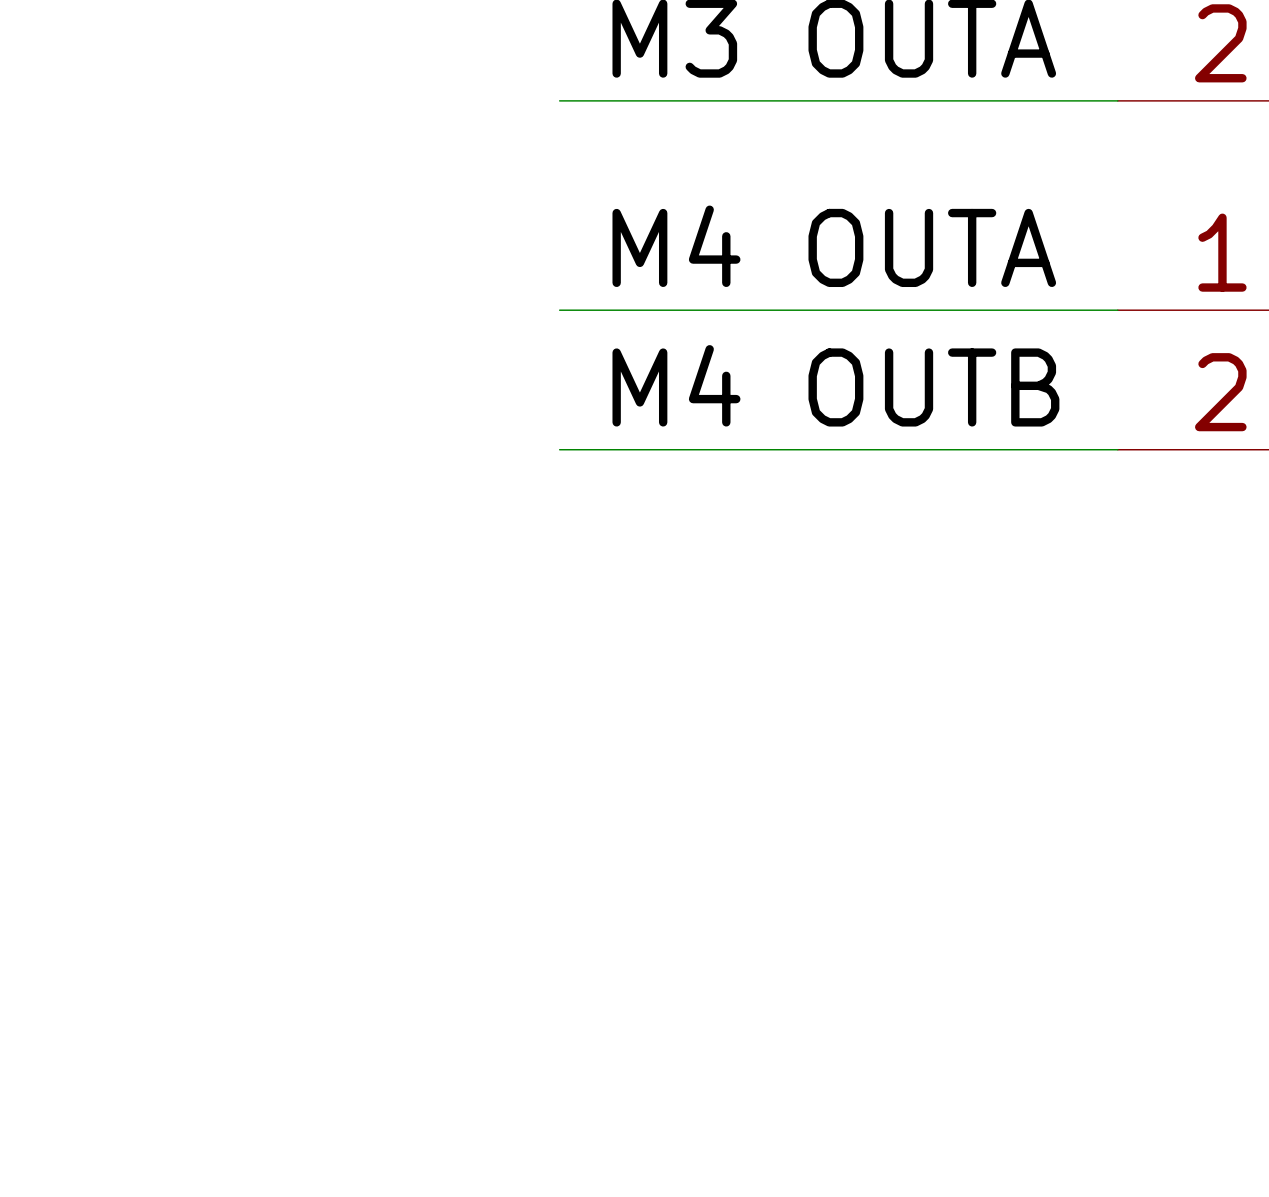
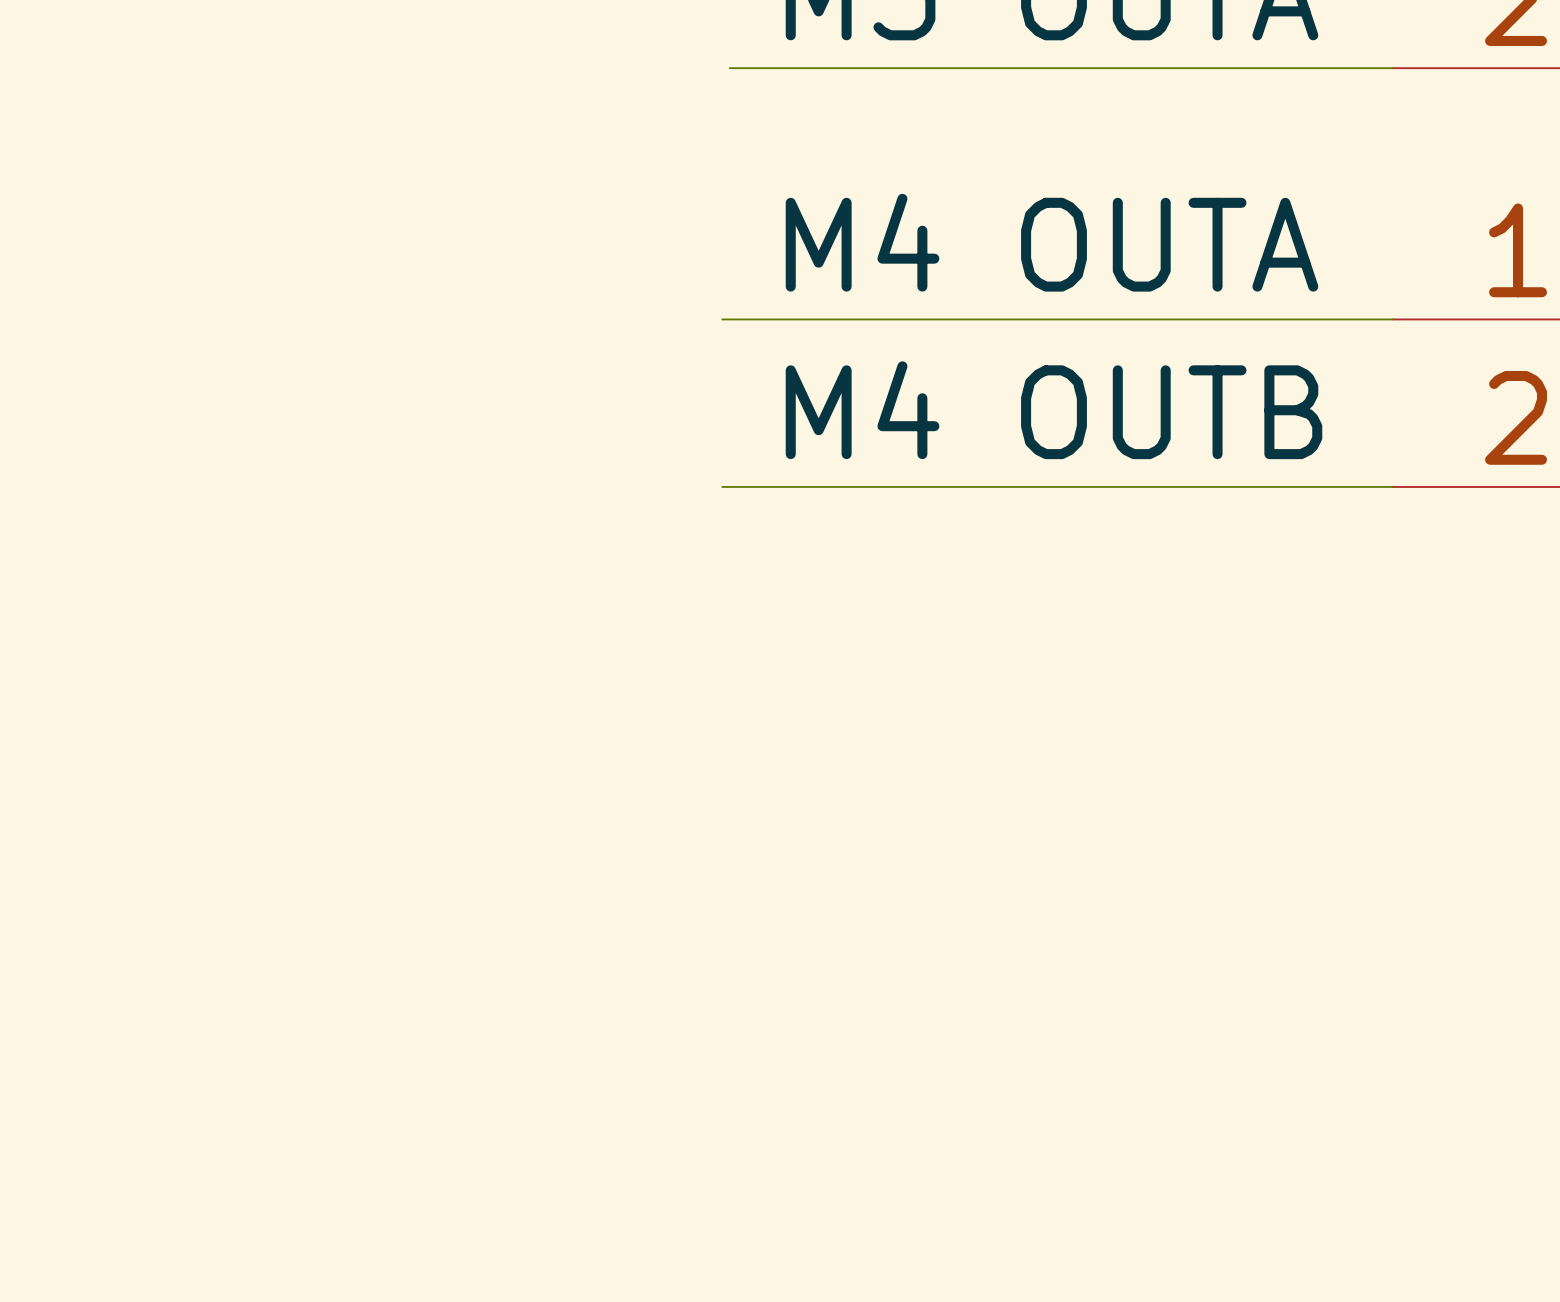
wire: (559, 100) (565, 100) -> none

